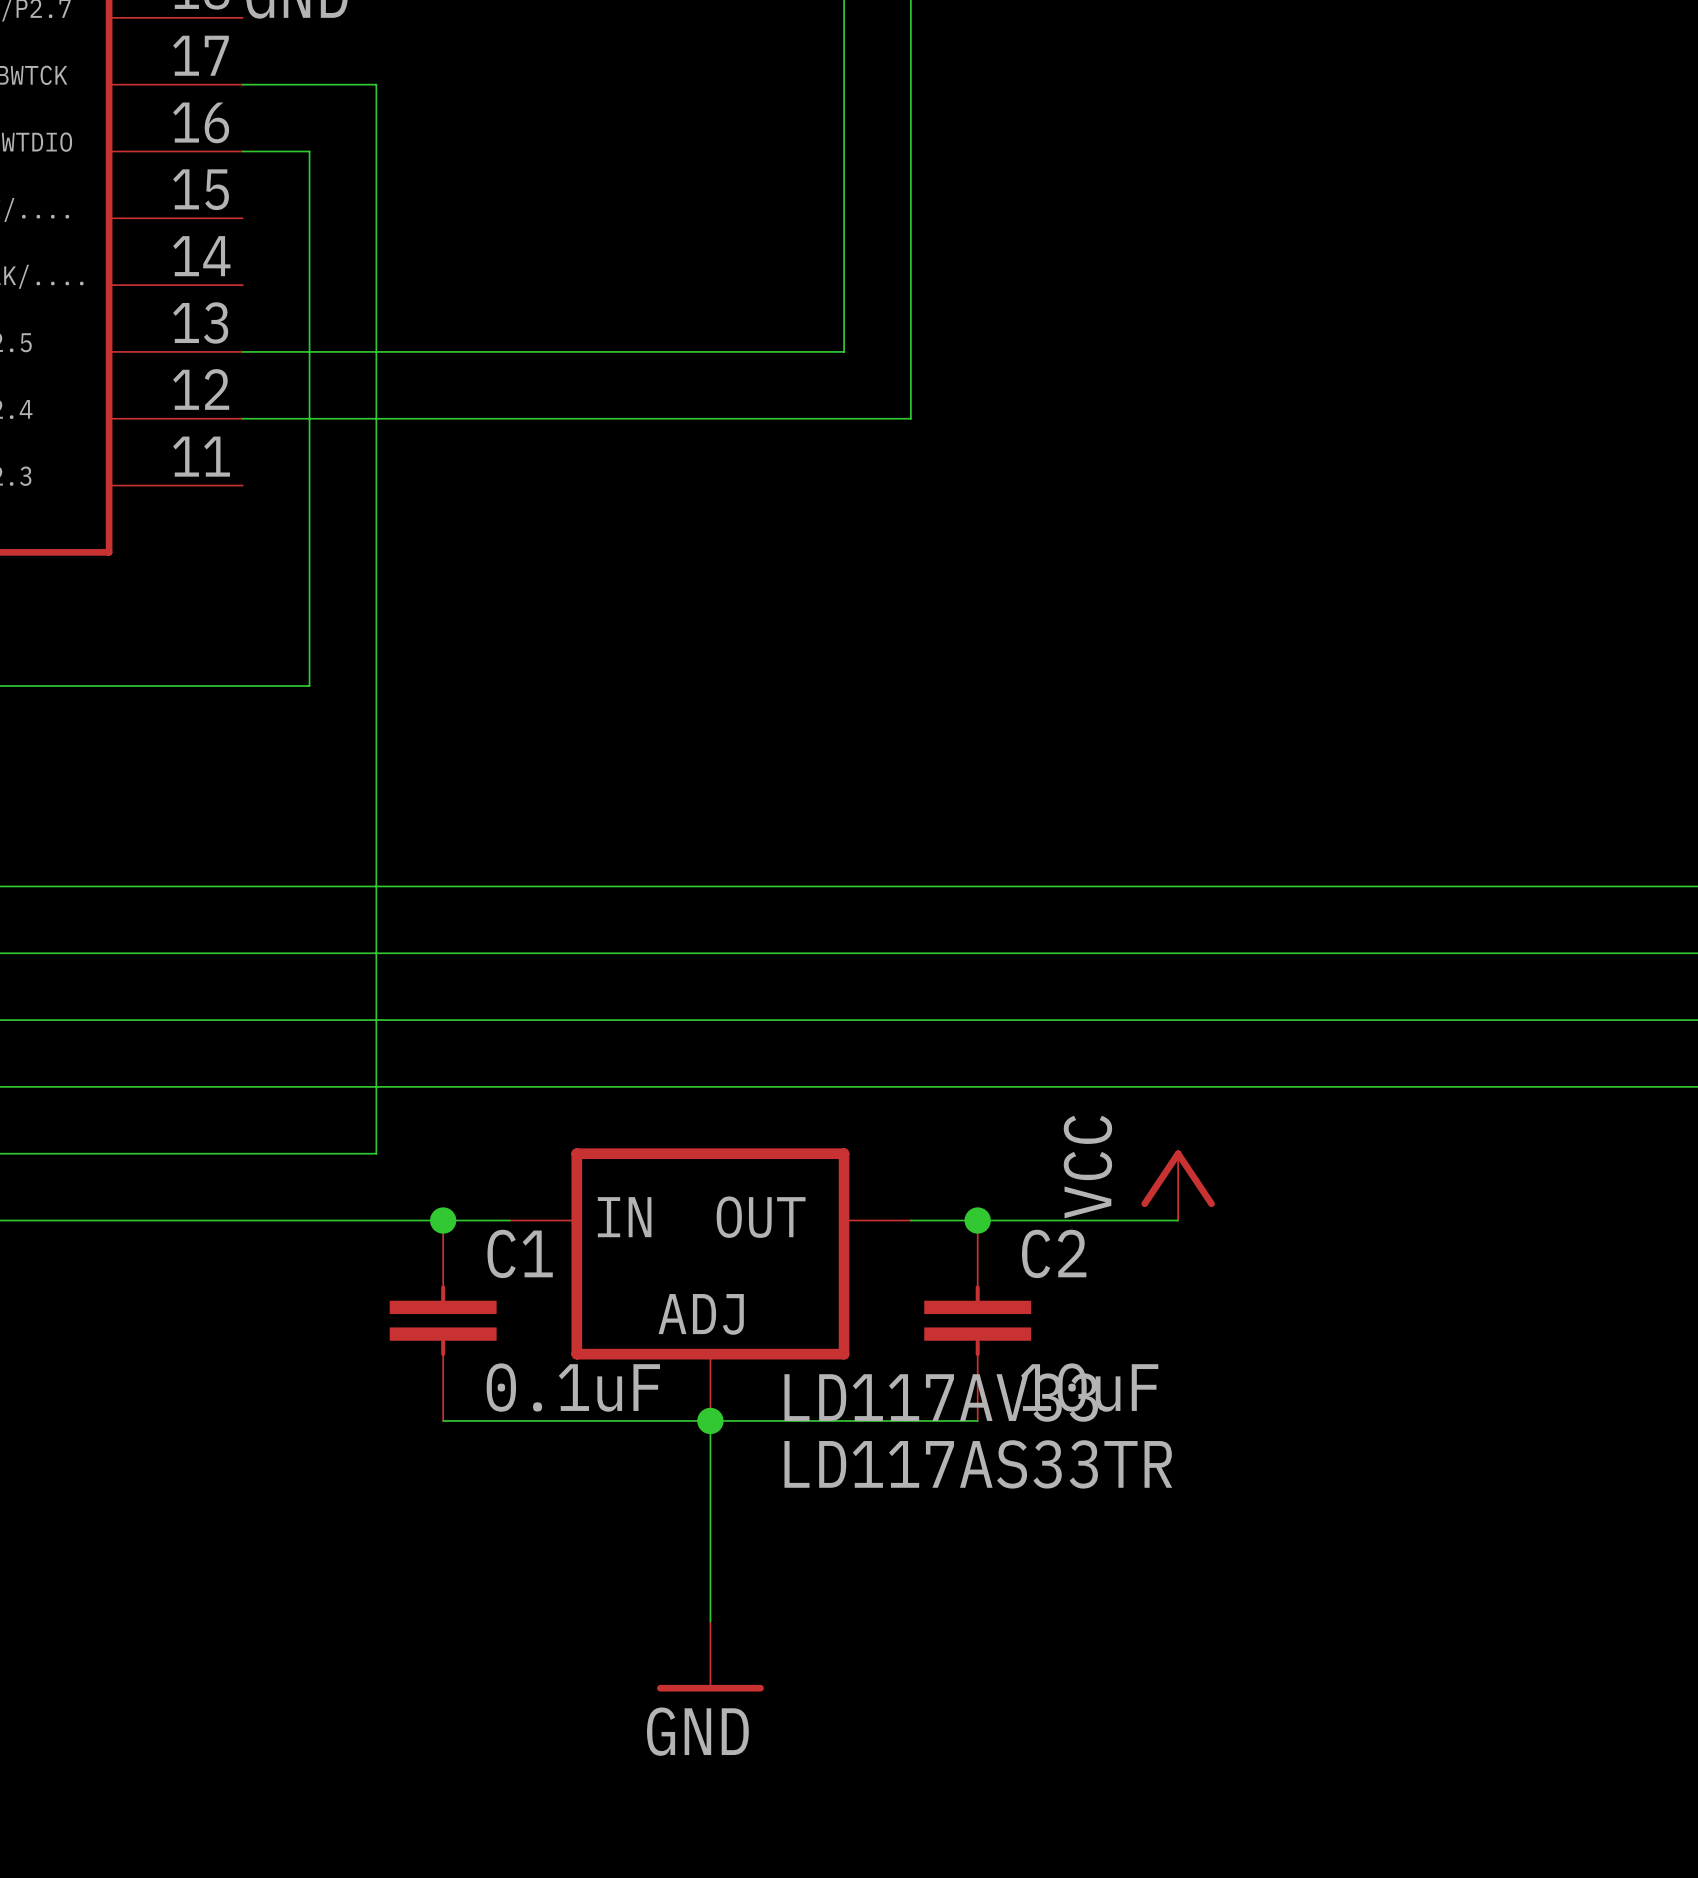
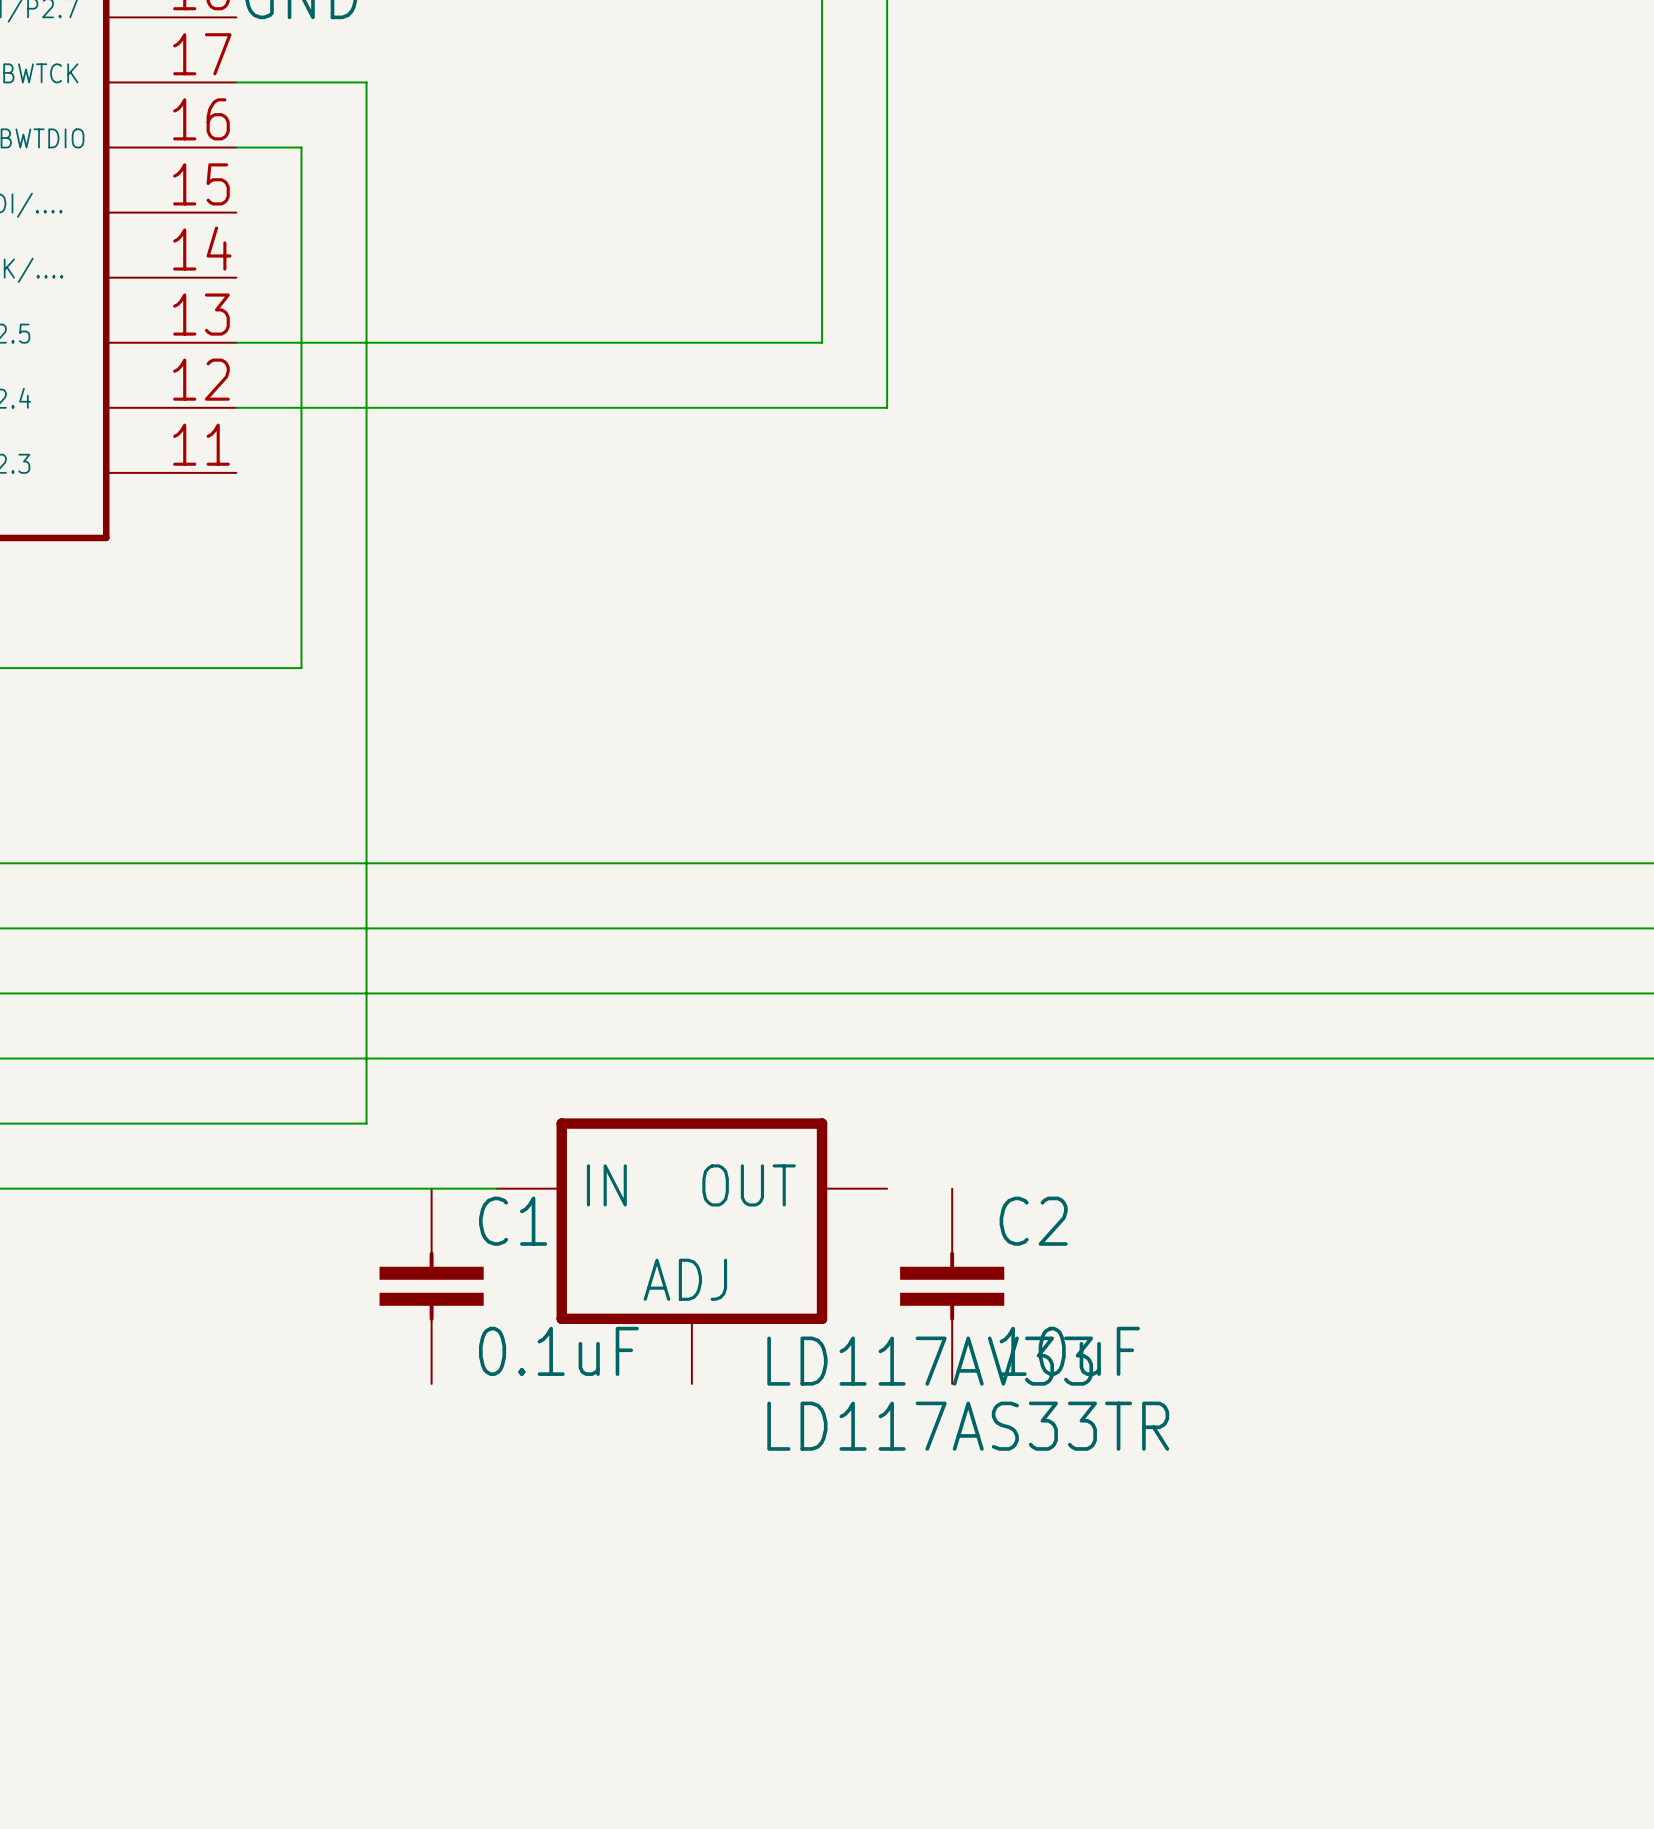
power symbol: VCC (1178, 1185) -> none
junction: (443, 1220) -> none
wire: (910, 1220) (1178, 1220) -> none
junction: (977, 1220) -> none
wire: (443, 1420) (977, 1420) -> none
wire: (710, 1420) (710, 1621) -> none
junction: (710, 1420) -> none
power symbol: GND (710, 1656) -> none

